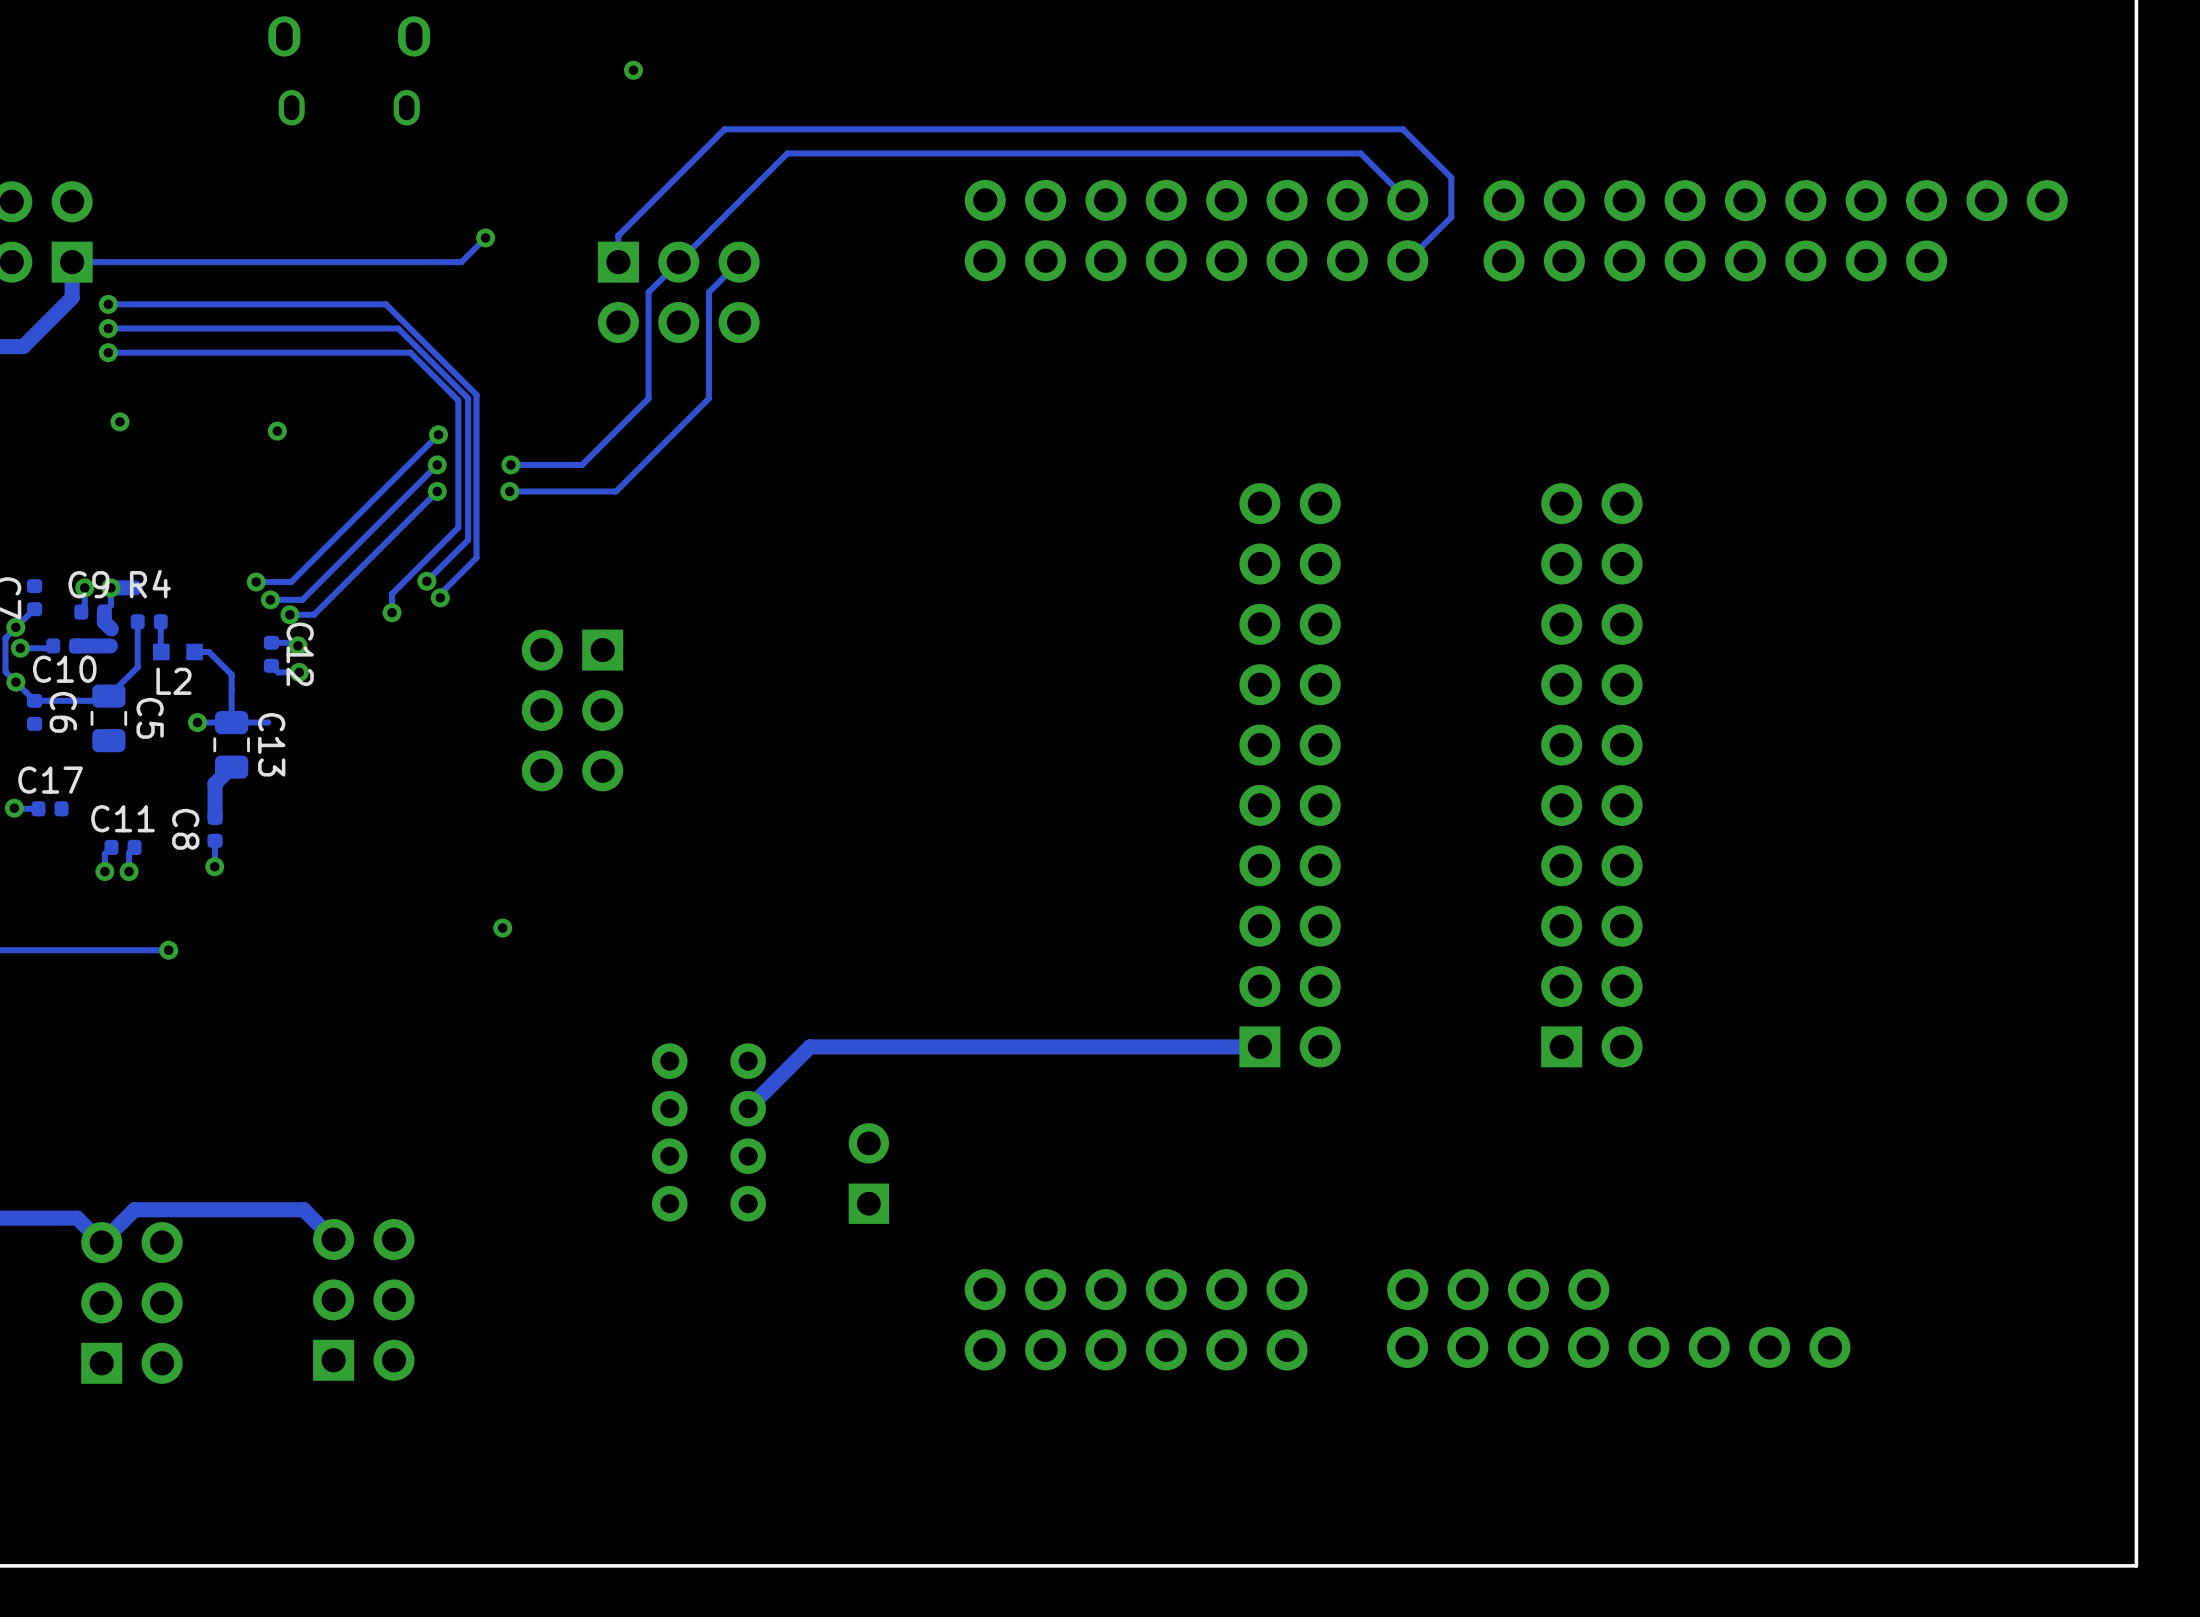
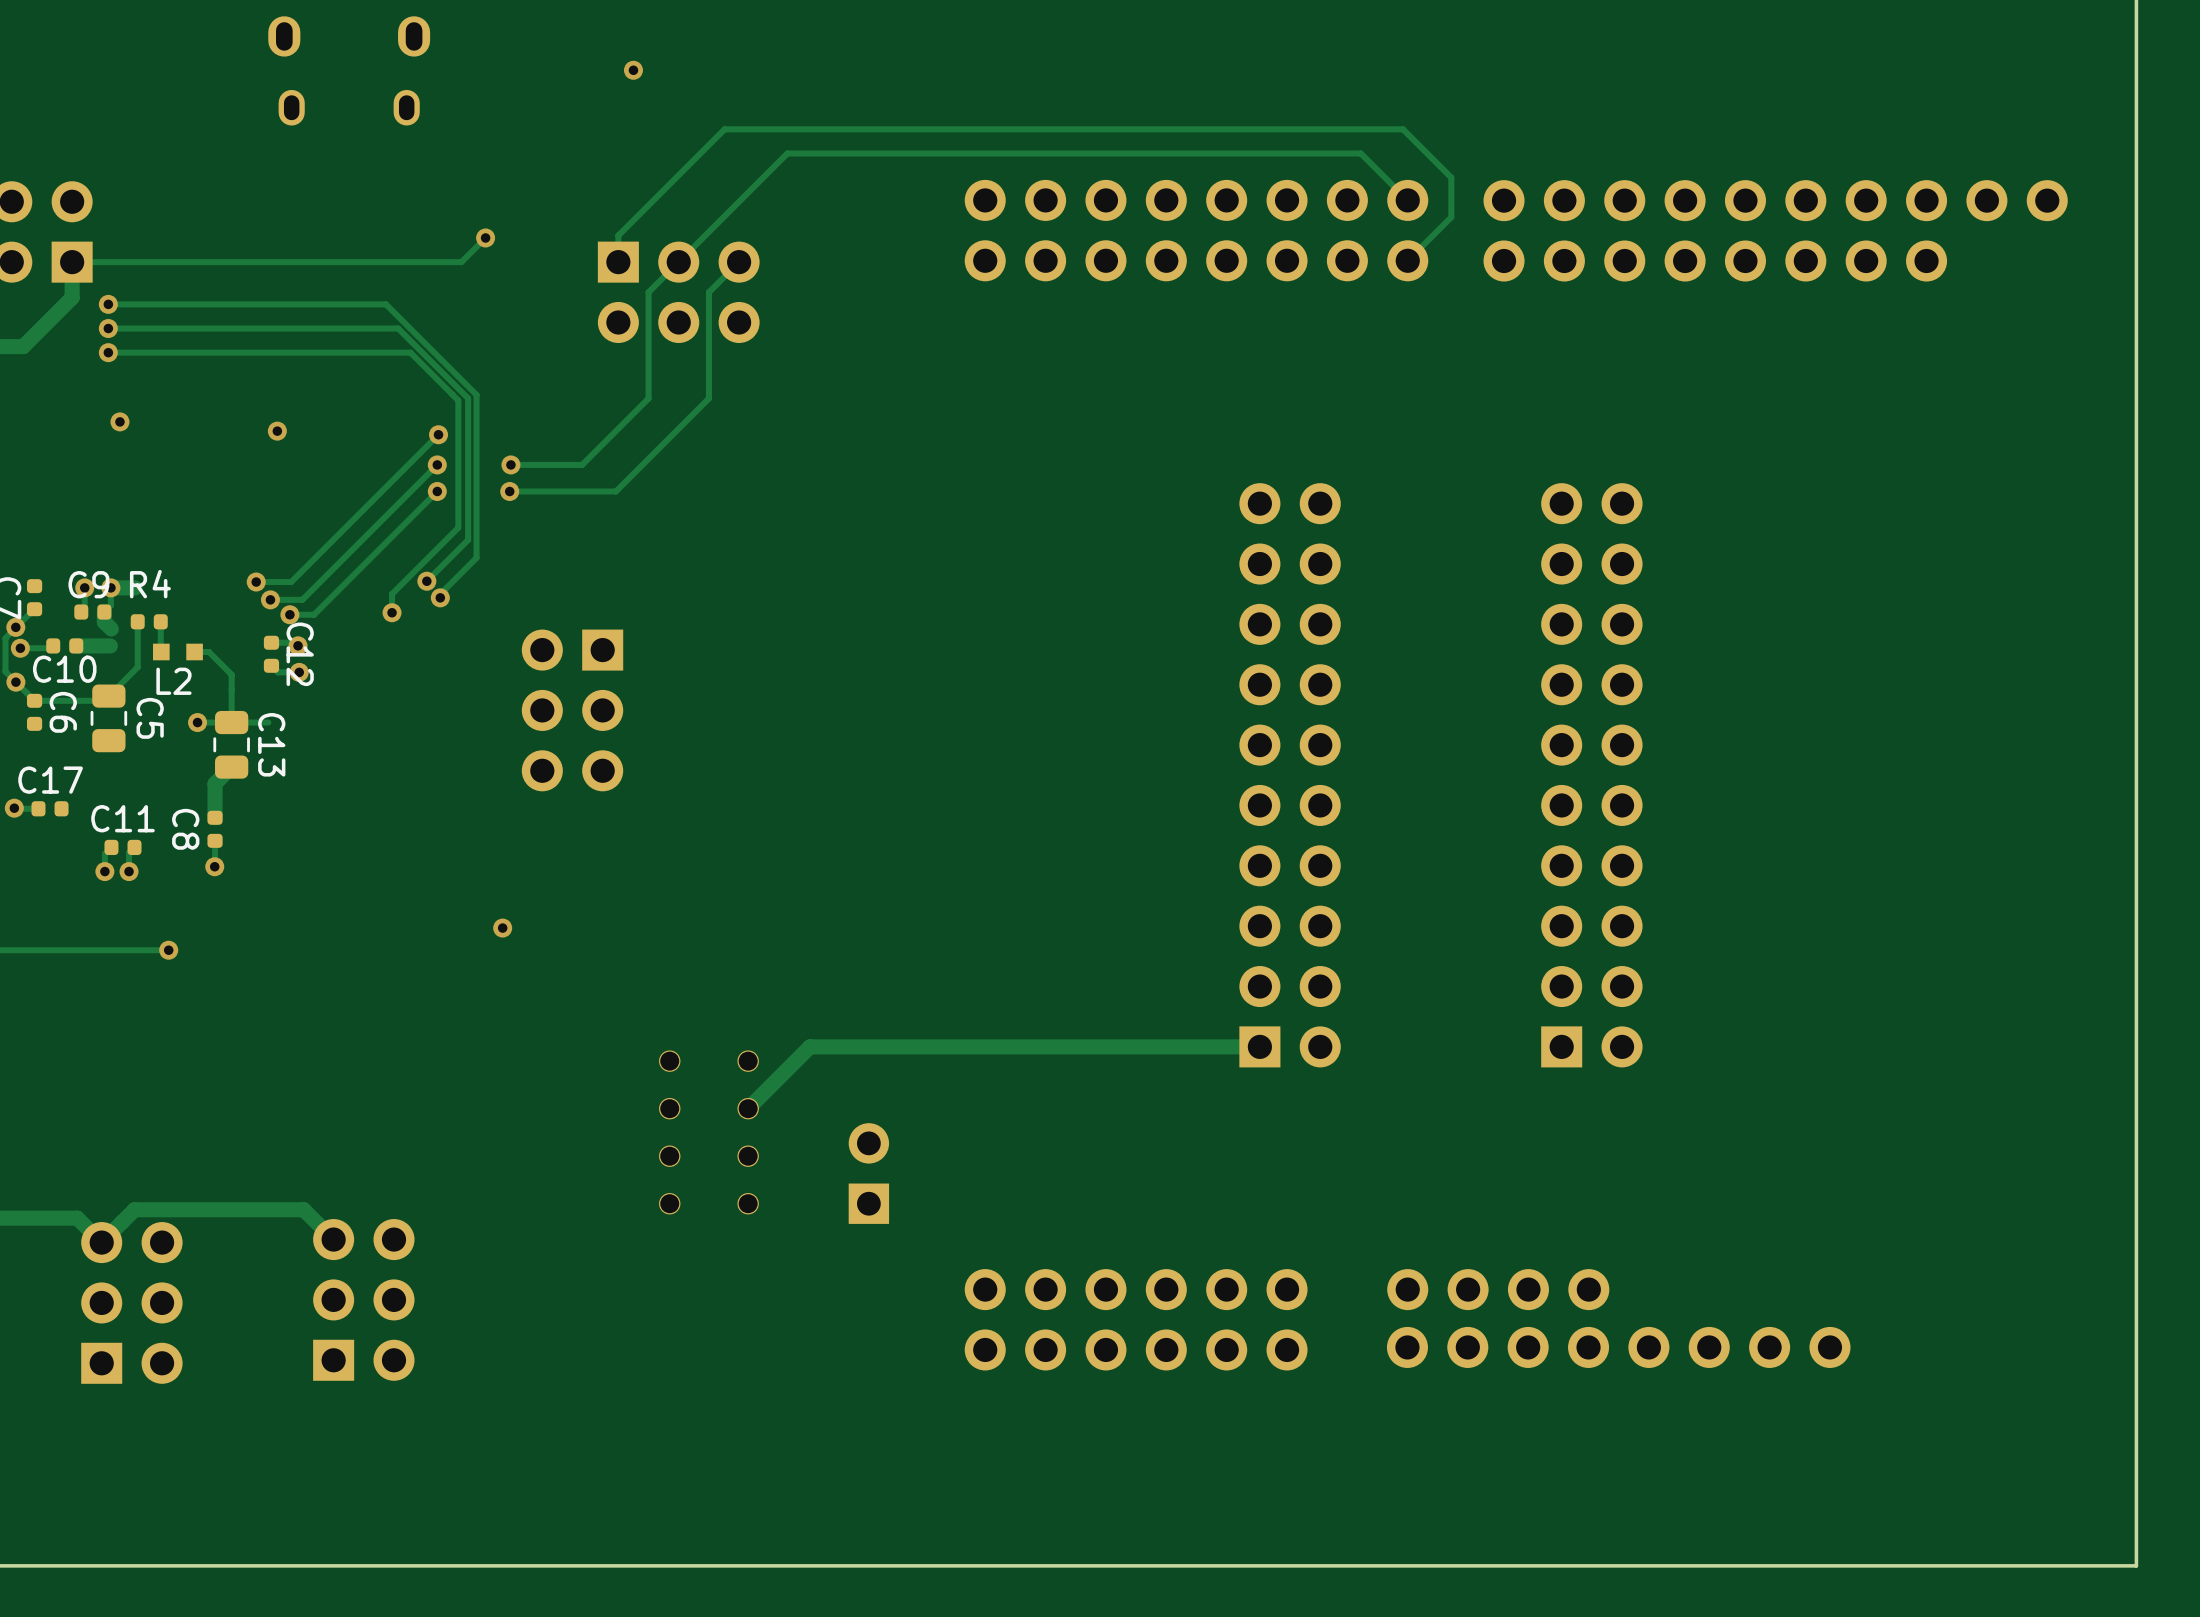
part footprint: [651, 1043, 766, 1222] -> [659, 1050, 759, 1215]

